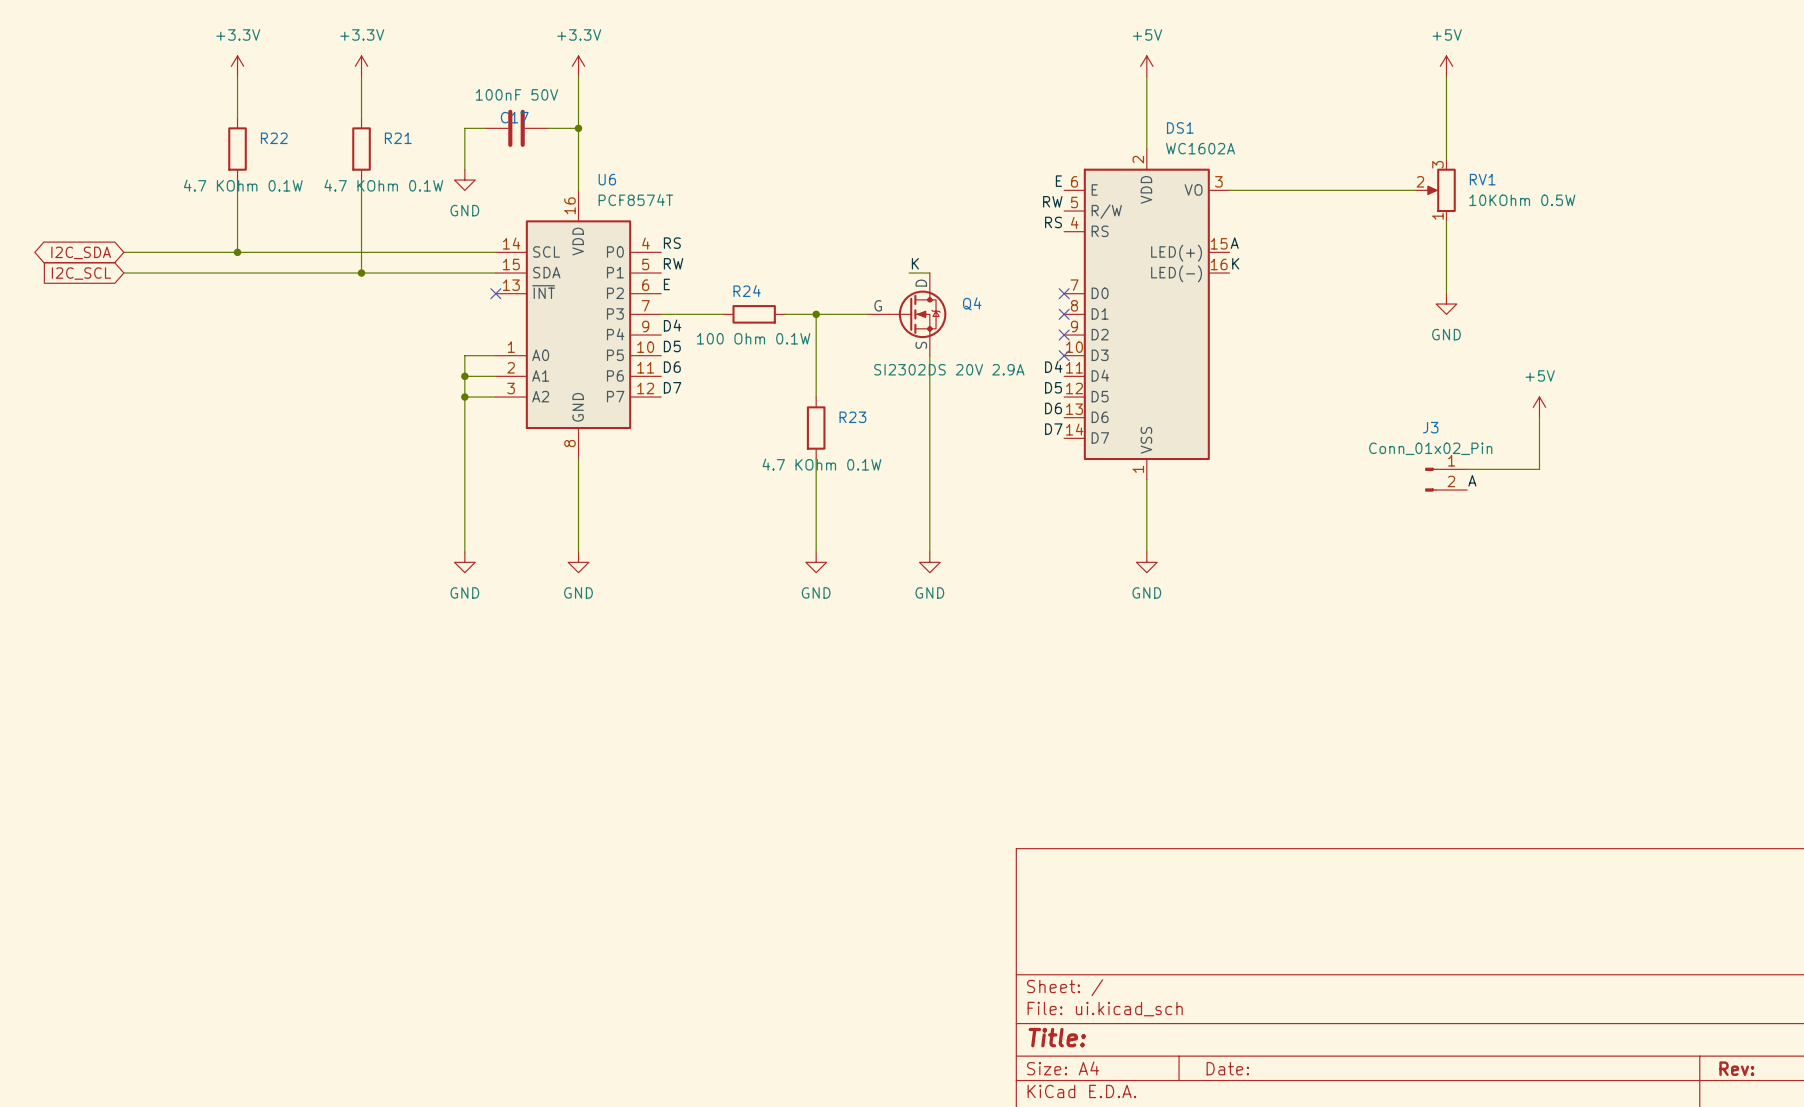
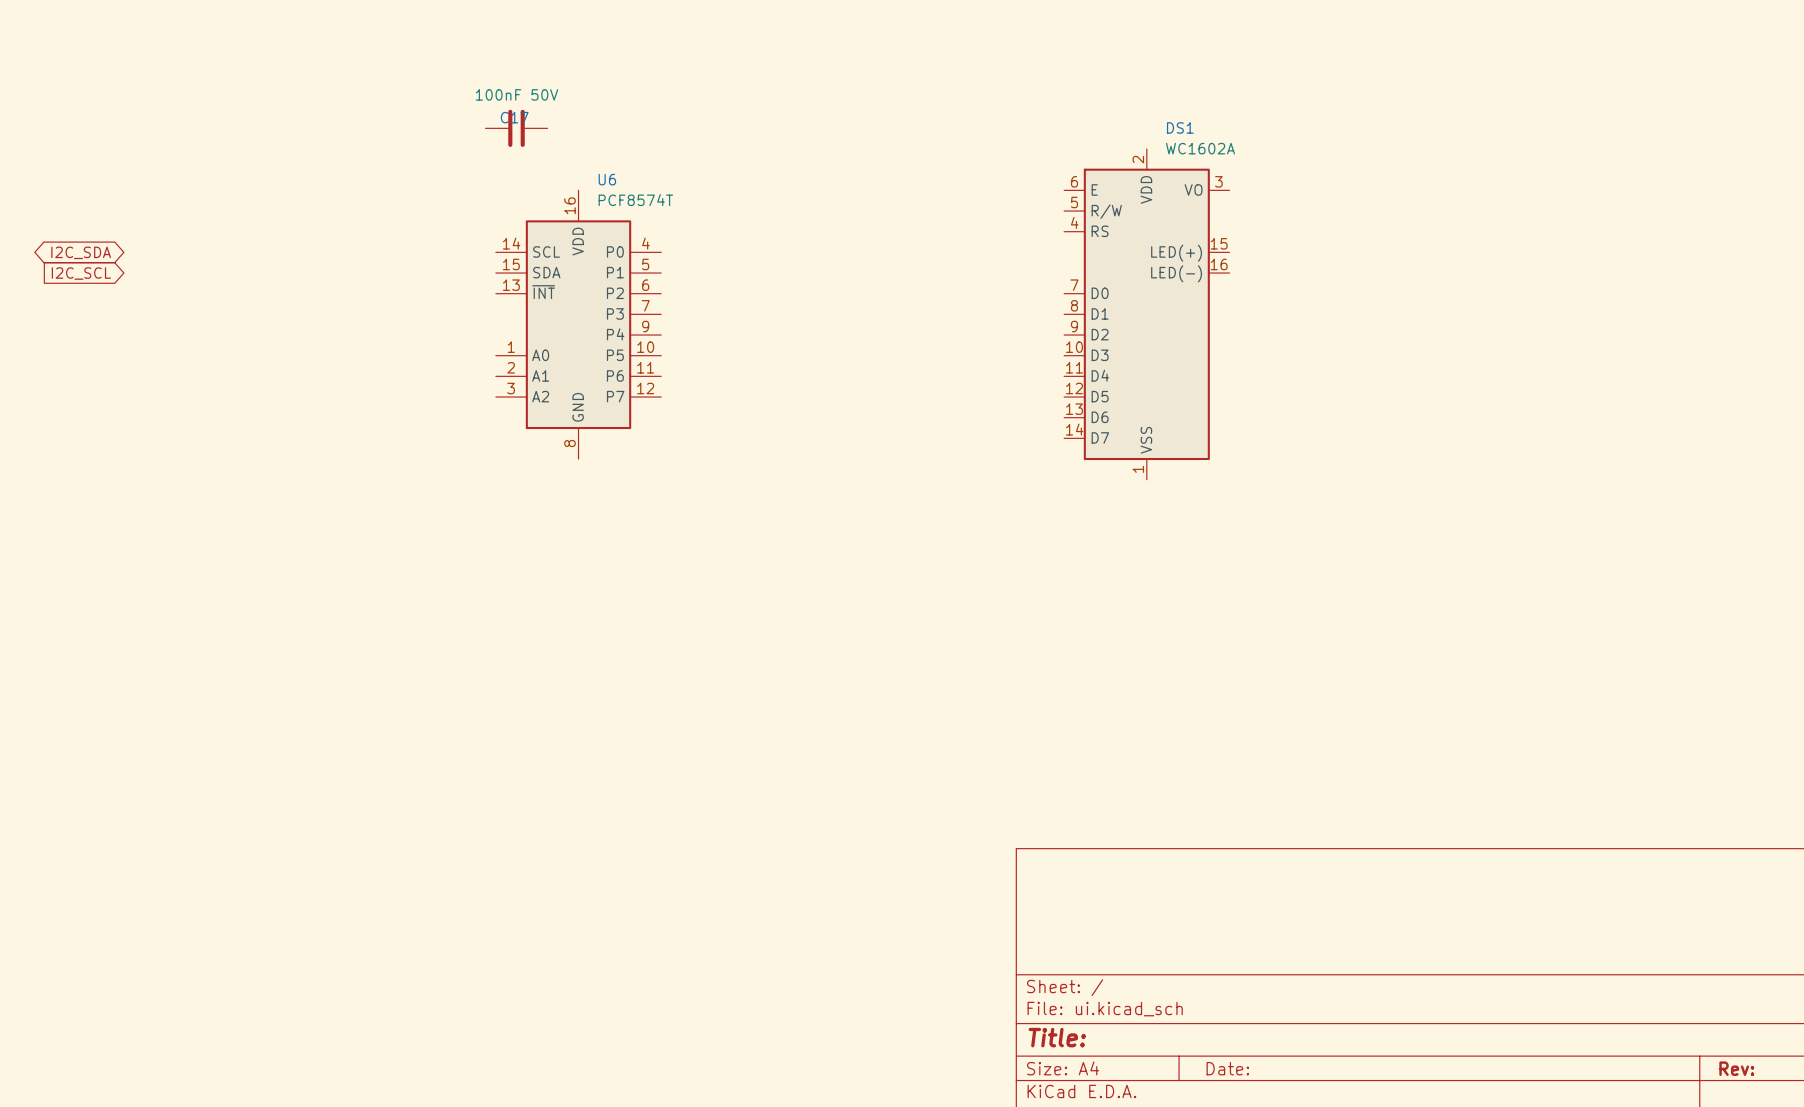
power symbol: +3.3V (237, 66) -> none
power symbol: +3.3V (361, 66) -> none
power symbol: +3.3V (578, 66) -> none
power symbol: +5V (1146, 66) -> none
power symbol: +5V (1446, 66) -> none
wire: (237, 76) (237, 118) -> none
wire: (361, 76) (361, 118) -> none
wire: (578, 76) (578, 190) -> none
wire: (1146, 76) (1146, 149) -> none
wire: (1446, 76) (1446, 159) -> none
wire: (485, 128) (464, 128) (464, 169) -> none
wire: (547, 128) (578, 128) -> none
junction: (578, 128) -> none
R22: 4.7 KOhm 0.1W (237, 149) -> none
R21: 4.7 KOhm 0.1W (361, 149) -> none
wire: (237, 180) (237, 252) -> none
wire: (361, 180) (361, 273) -> none
power symbol: GND (464, 180) -> none
label: E (1058, 181) -> none
wire: (1229, 190) (1415, 190) -> none
RV1: 10KOhm 0.5W (1435, 190) -> none
label: RW (1052, 201) -> none
wire: (1446, 221) (1446, 293) -> none
label: RS (1053, 222) -> none
label: RS (672, 243) -> none
label: A (1234, 243) -> none
wire: (123, 252) (495, 252) -> none
junction: (237, 252) -> none
label: RW (673, 263) -> none
label: K (915, 263) -> none
label: K (1235, 263) -> none
wire: (123, 273) (495, 273) -> none
junction: (361, 273) -> none
wire: (909, 273) (929, 273) -> none
label: E (666, 284) -> none
no-connect mark: (495, 293) -> none
no-connect mark: (1064, 293) -> none
power symbol: GND (1446, 304) -> none
wire: (661, 314) (723, 314) -> none
R24: 100 Ohm 0.1W (754, 314) -> none
wire: (785, 314) (867, 314) -> none
wire: (816, 314) (816, 397) -> none
junction: (816, 314) -> none
Q4: SI2302DS 20V 2.9A (907, 314) -> none
no-connect mark: (1064, 314) -> none
label: D4 (672, 325) -> none
no-connect mark: (1064, 335) -> none
label: D5 (672, 346) -> none
wire: (495, 355) (464, 355) (464, 552) -> none
wire: (929, 355) (929, 552) -> none
no-connect mark: (1064, 355) -> none
label: D4 (1053, 366) -> none
label: D6 (672, 367) -> none
wire: (464, 376) (495, 376) -> none
junction: (464, 376) -> none
label: D7 (672, 387) -> none
label: D5 (1053, 387) -> none
wire: (464, 397) (495, 397) -> none
junction: (464, 397) -> none
power symbol: +5V (1539, 407) -> none
label: D6 (1053, 408) -> none
wire: (1539, 417) (1539, 469) (1467, 469) -> none
R23: 4.7 KOhm 0.1W (816, 428) -> none
label: D7 (1053, 429) -> none
wire: (578, 459) (578, 552) -> none
wire: (816, 459) (816, 552) -> none
wire: (1146, 479) (1146, 552) -> none
J3: Conn_01x02_Pin (1446, 479) -> none
label: A (1472, 480) -> none
power symbol: GND (464, 562) -> none
power symbol: GND (578, 562) -> none
power symbol: GND (816, 562) -> none
power symbol: GND (929, 562) -> none
power symbol: GND (1146, 562) -> none

